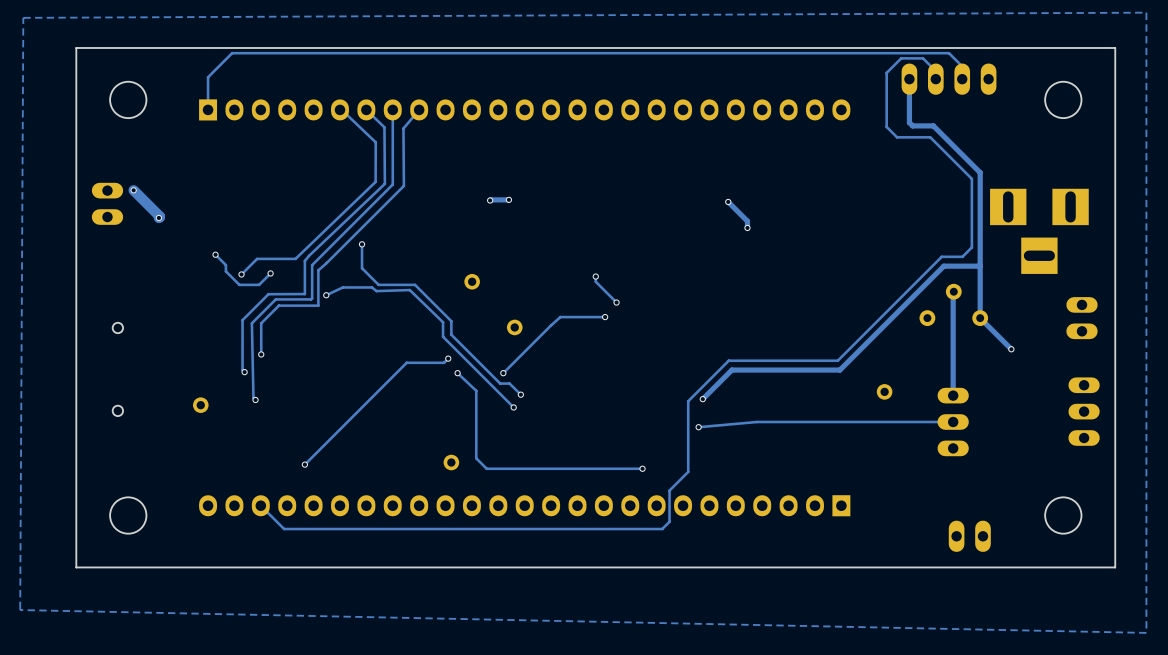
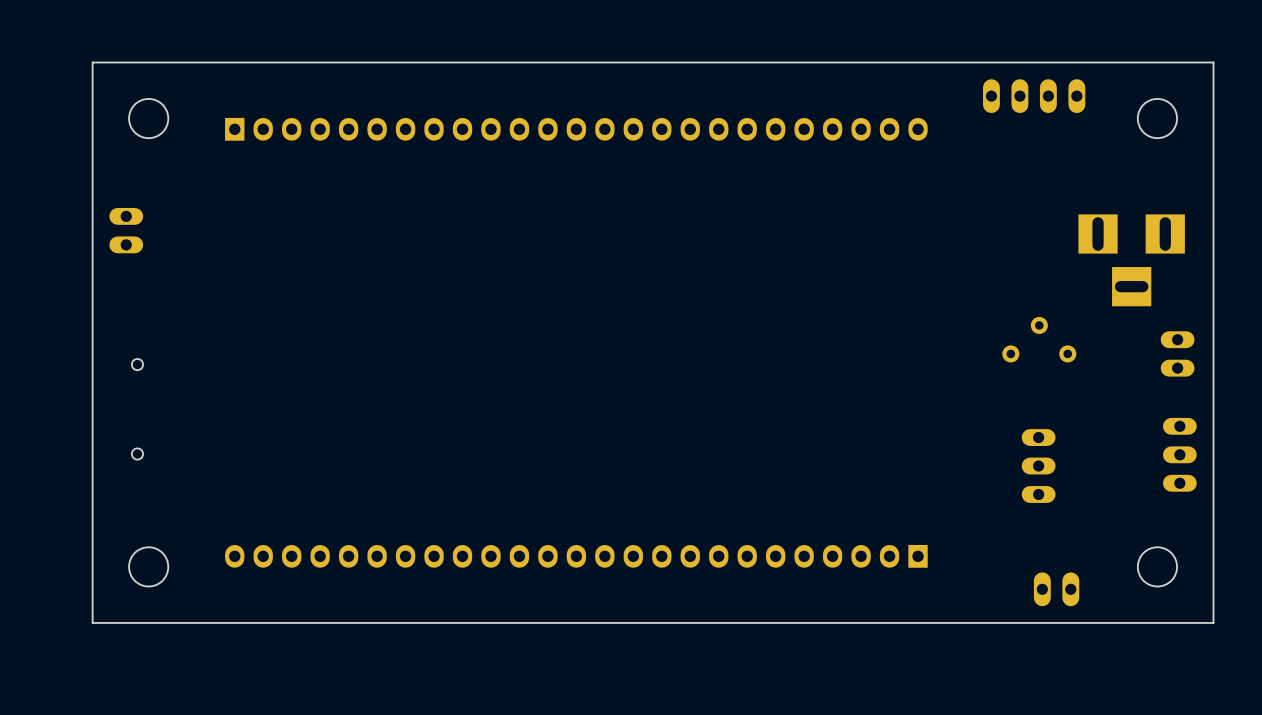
zone outline: (1146, 12) (23, 17) (20, 610) (1146, 632) (1146, 12) -> none
track: (909, 79) (909, 122) (912, 125) (933, 125) (980, 172) (980, 318) (1011, 349) -> none
track: (935, 79) (935, 71) (923, 58) (901, 58) (886, 72) (886, 126) (897, 137) (930, 137) (971, 178) (971, 247) (962, 256) (941, 256) (837, 360) (728, 360) (688, 401) (688, 471) (669, 490) (669, 521) (662, 529) (284, 529) (260, 505) -> none
track: (962, 79) (962, 66) (949, 53) (232, 53) (208, 77) (208, 109) -> none
track: (340, 108) (375, 142) (375, 181) (295, 258) (257, 258) (241, 274) -> none
track: (366, 109) (384, 127) (384, 183) (304, 260) (304, 294) (268, 294) (242, 320) (242, 370) (244, 372) -> none
track: (392, 109) (392, 184) (312, 265) (311, 299) (275, 299) (251, 323) (253, 397) (255, 399) -> none
track: (419, 109) (403, 128) (403, 185) (318, 270) (318, 305) (278, 305) (261, 323) (261, 354) -> none
track: (133, 190) (159, 216) (158, 217) -> none
via: (133, 190) -> none
track: (508, 199) (490, 200) -> none
via: (508, 199) -> none
via: (490, 200) -> none
track: (728, 201) (747, 221) (747, 227) -> none
via: (728, 201) -> none
via: (158, 217) -> none
via: (747, 227) -> none
track: (362, 244) (362, 268) (378, 284) (415, 284) (451, 321) (451, 334) (500, 383) (509, 383) (520, 394) -> none
via: (362, 244) -> none
track: (215, 254) (225, 265) (225, 271) (239, 284) (259, 284) (270, 273) -> none
via: (215, 254) -> none
track: (980, 266) (943, 266) (839, 370) (731, 370) (702, 399) -> none
via: (270, 273) -> none
via: (241, 274) -> none
track: (595, 276) (595, 281) (616, 302) -> none
via: (595, 276) -> none
part: (472, 281) -> none
track: (371, 287) (376, 291) (409, 290) (443, 322) (443, 336) (513, 407) -> none
track: (372, 287) (342, 287) (326, 295) -> none
track: (953, 291) (953, 395) -> none
via: (326, 295) -> none
via: (616, 302) -> none
track: (605, 317) (560, 317) (503, 373) -> none
via: (605, 317) -> none
part: (514, 327) -> none
via: (1011, 349) -> none
via: (261, 354) -> none
track: (448, 358) (444, 362) (406, 362) (304, 464) -> none
via: (448, 358) -> none
via: (244, 372) -> none
track: (457, 373) (476, 390) (476, 458) (486, 468) (642, 468) -> none
via: (457, 373) -> none
via: (503, 373) -> none
part: (884, 391) -> none
via: (520, 394) -> none
via: (255, 399) -> none
via: (702, 399) -> none
part: (200, 405) -> none
via: (513, 407) -> none
track: (953, 422) (756, 422) (698, 427) -> none
via: (698, 427) -> none
part: (451, 462) -> none
via: (304, 464) -> none
via: (642, 468) -> none

